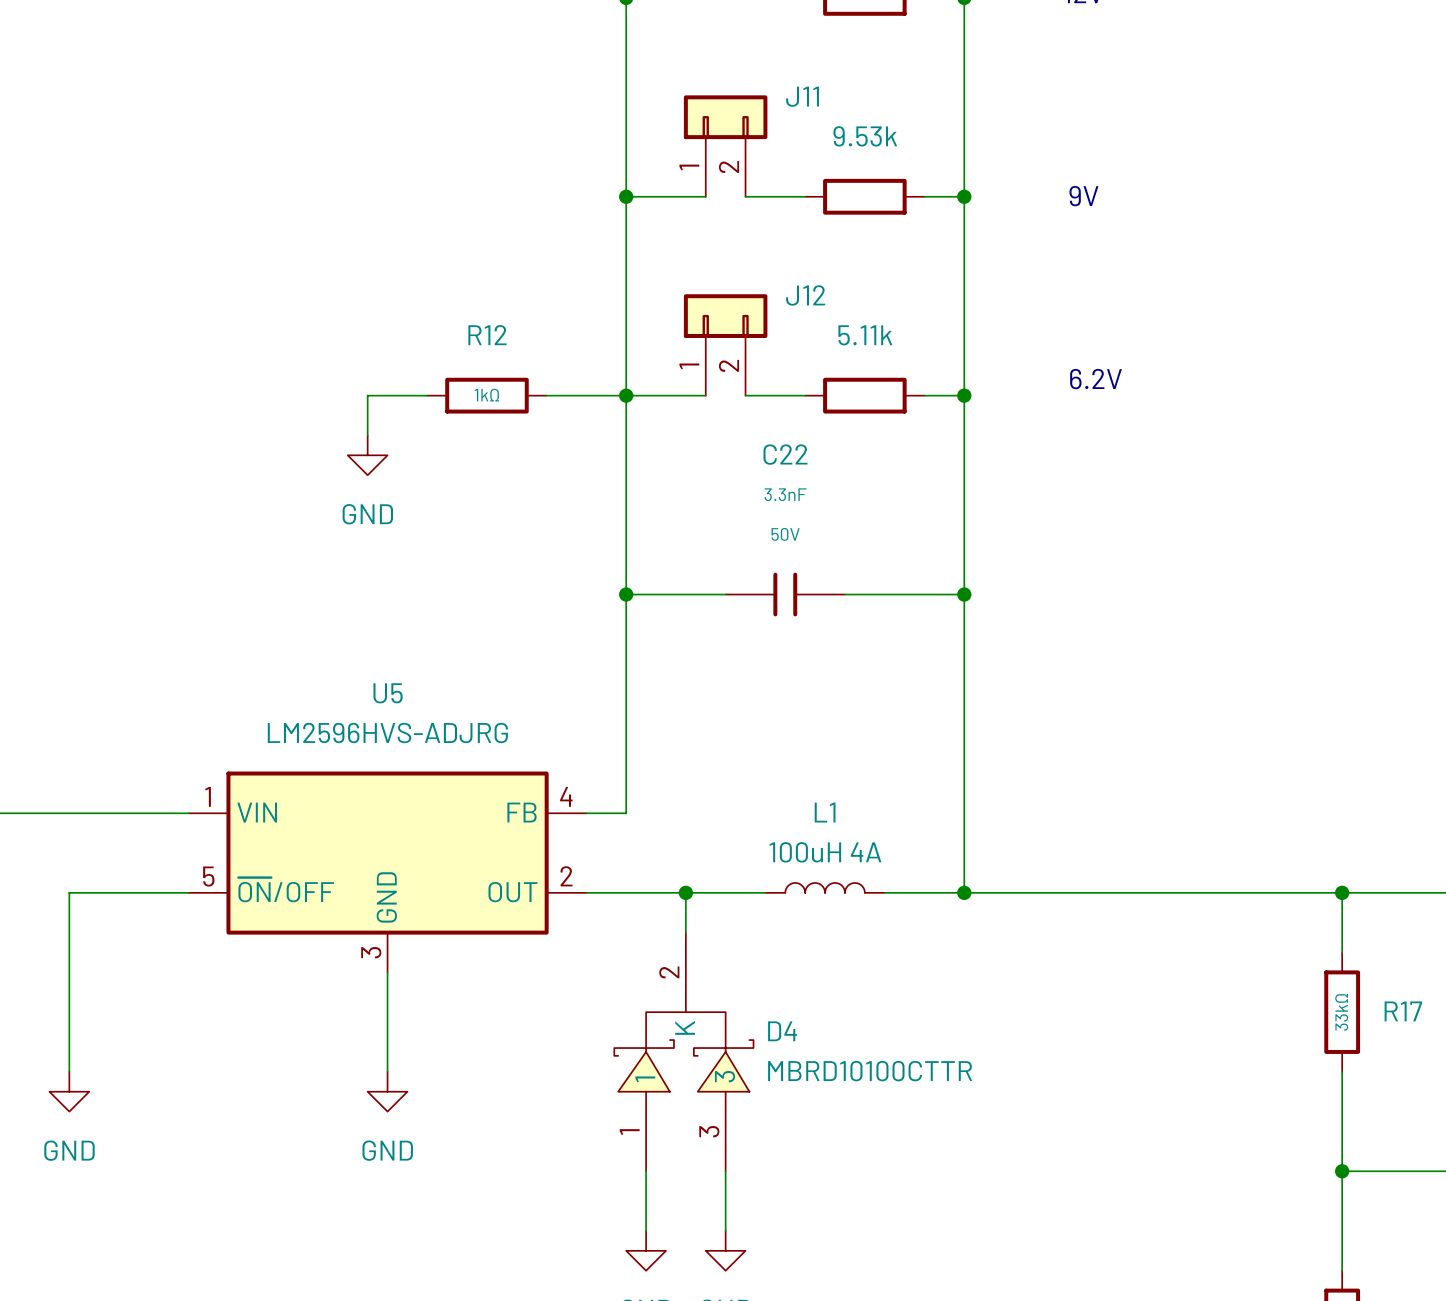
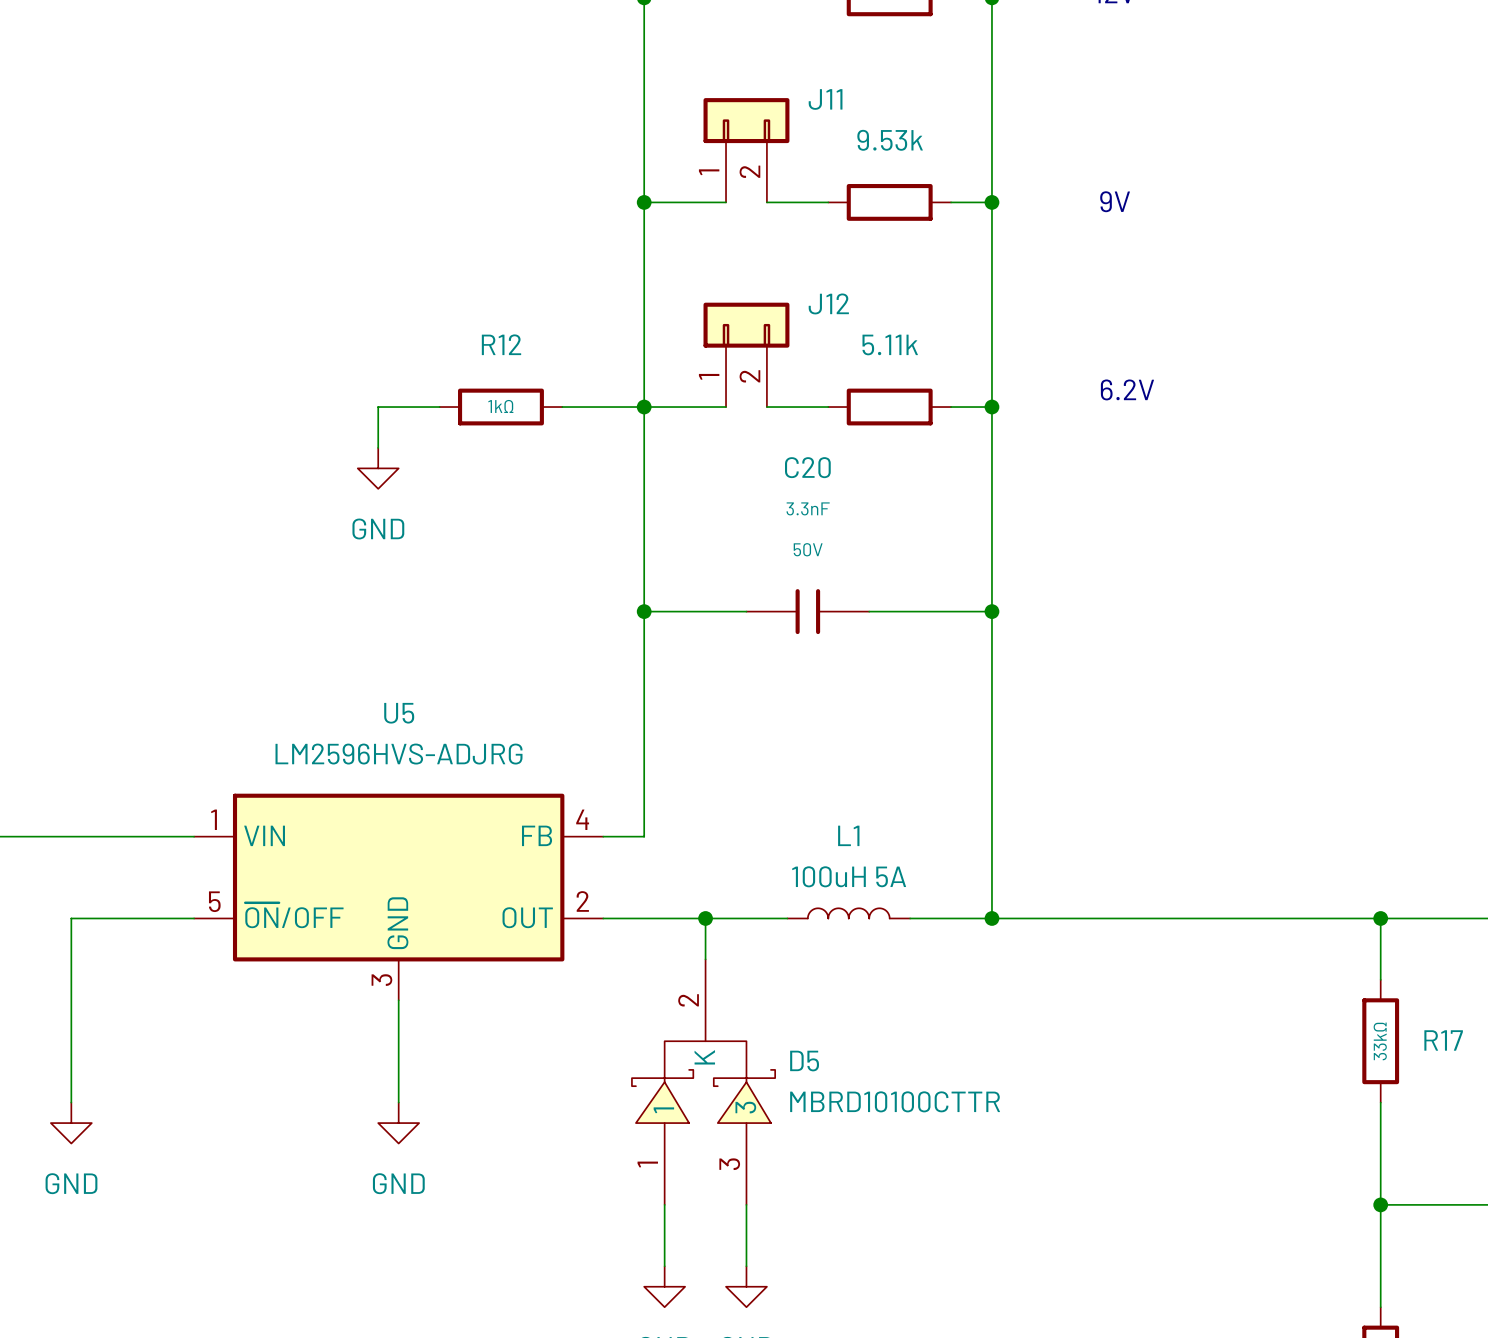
C22 name: C22 (785, 454) -> C20 (807, 467)
L1 value: 100uH 4A (825, 852) -> 100uH 5A (849, 876)
D4 name: D4 (782, 1031) -> D5 (804, 1061)

